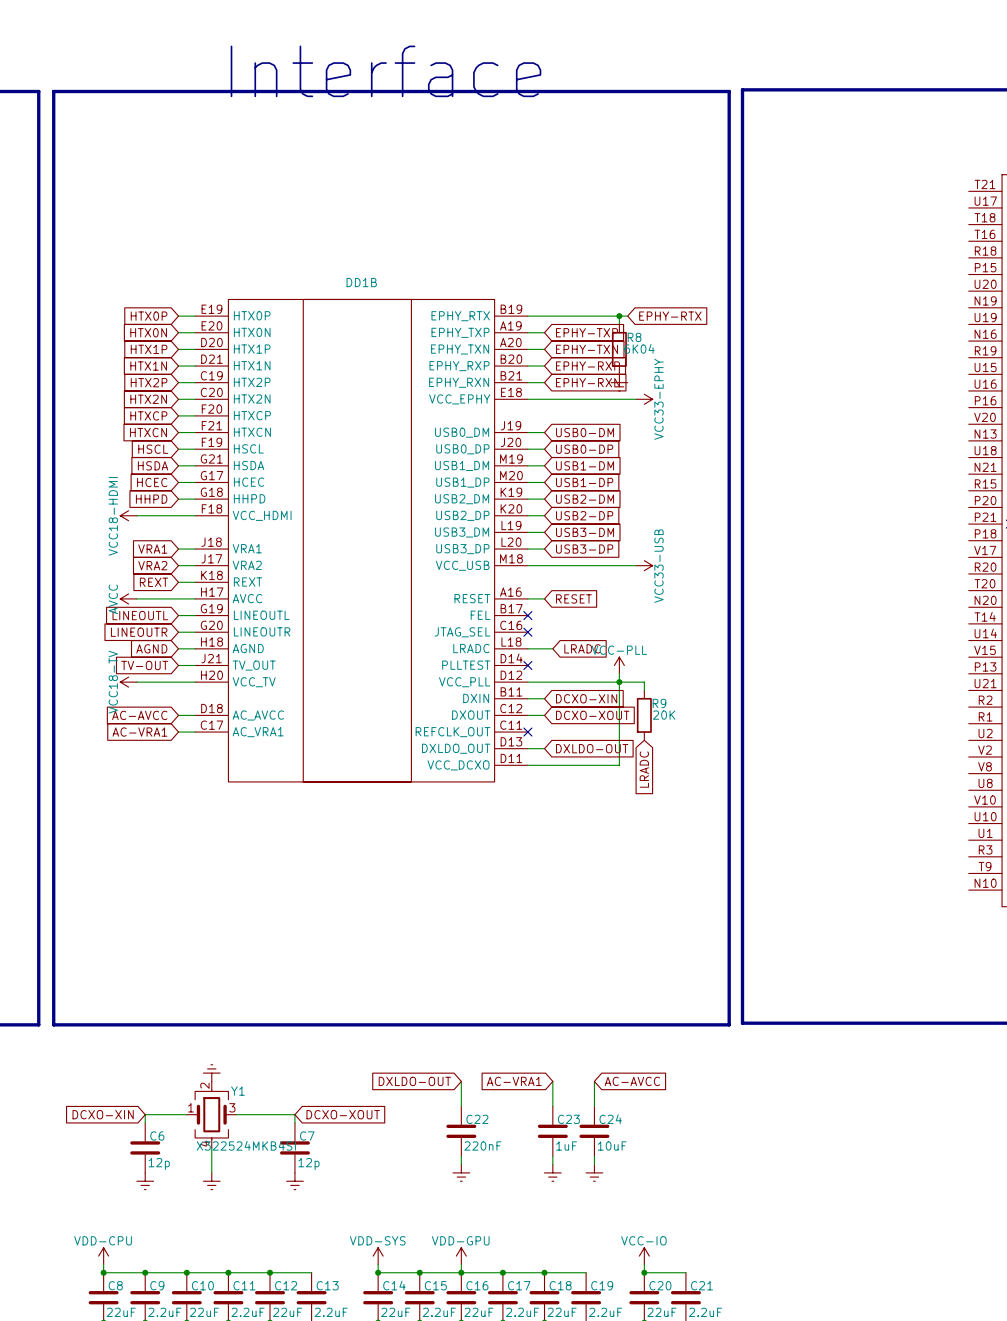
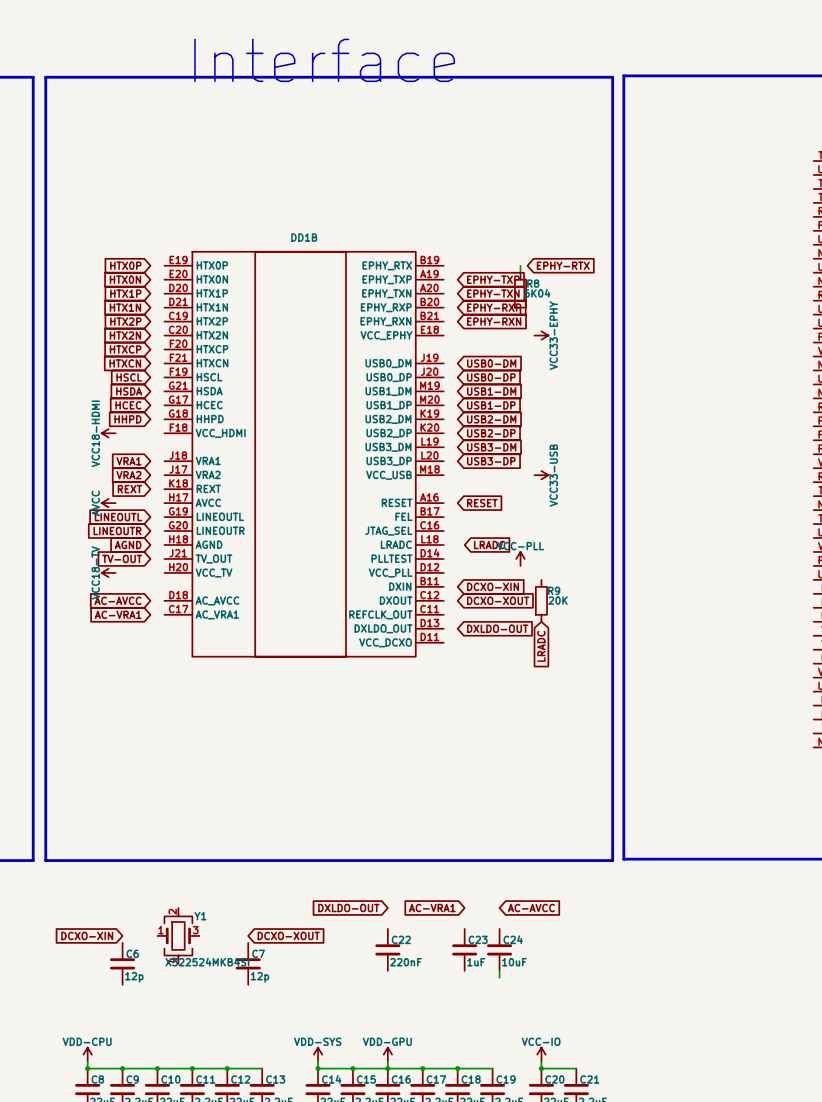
wire: (178, 316) (195, 316) -> none
wire: (527, 316) (627, 316) -> none
junction: (619, 316) -> none
wire: (178, 332) (195, 332) -> none
wire: (527, 332) (544, 332) -> none
wire: (178, 349) (195, 349) -> none
wire: (527, 349) (544, 349) -> none
wire: (178, 366) (195, 366) -> none
wire: (527, 366) (544, 366) -> none
wire: (178, 382) (195, 382) -> none
wire: (527, 382) (544, 382) -> none
power symbol: (619, 382) -> none
wire: (178, 399) (195, 399) -> none
wire: (527, 399) (636, 399) -> none
wire: (178, 415) (195, 415) -> none
wire: (178, 432) (195, 432) -> none
wire: (527, 432) (544, 432) -> none
wire: (178, 449) (195, 449) -> none
wire: (527, 449) (544, 449) -> none
wire: (178, 465) (195, 465) -> none
wire: (527, 465) (544, 465) -> none
wire: (178, 482) (195, 482) -> none
wire: (527, 482) (544, 482) -> none
wire: (178, 499) (195, 499) -> none
wire: (527, 499) (544, 499) -> none
wire: (136, 515) (195, 515) -> none
wire: (527, 515) (544, 515) -> none
wire: (527, 532) (544, 532) -> none
wire: (178, 549) (195, 549) -> none
wire: (527, 549) (544, 549) -> none
wire: (178, 565) (195, 565) -> none
wire: (527, 565) (636, 565) -> none
wire: (178, 582) (195, 582) -> none
wire: (136, 598) (195, 598) -> none
wire: (527, 598) (544, 598) -> none
wire: (178, 615) (195, 615) -> none
no-connect mark: (527, 615) -> none
wire: (178, 632) (195, 632) -> none
no-connect mark: (527, 632) -> none
wire: (178, 648) (195, 648) -> none
wire: (527, 648) (552, 648) -> none
wire: (178, 665) (195, 665) -> none
no-connect mark: (527, 665) -> none
wire: (619, 673) (619, 765) (527, 765) -> none
wire: (136, 682) (195, 682) -> none
wire: (527, 682) (644, 682) (644, 690) -> none
junction: (619, 682) -> none
wire: (527, 698) (544, 698) -> none
wire: (178, 715) (195, 715) -> none
wire: (527, 715) (544, 715) -> none
wire: (178, 732) (195, 732) -> none
no-connect mark: (527, 732) -> none
wire: (527, 748) (544, 748) -> none
power symbol: (211, 1073) -> none
wire: (461, 1081) (461, 1106) -> none
wire: (552, 1081) (552, 1106) -> none
wire: (594, 1081) (594, 1106) -> none
wire: (186, 1114) (145, 1114) (145, 1123) -> none
wire: (236, 1114) (294, 1114) (294, 1123) -> none
wire: (211, 1147) (211, 1172) -> none
wire: (461, 1156) (461, 1164) -> none
wire: (552, 1156) (552, 1164) -> none
power symbol: (461, 1172) -> none
power symbol: (552, 1172) -> none
power symbol: (594, 1172) -> none
power symbol: (145, 1181) -> none
power symbol: (211, 1181) -> none
power symbol: (294, 1181) -> none

